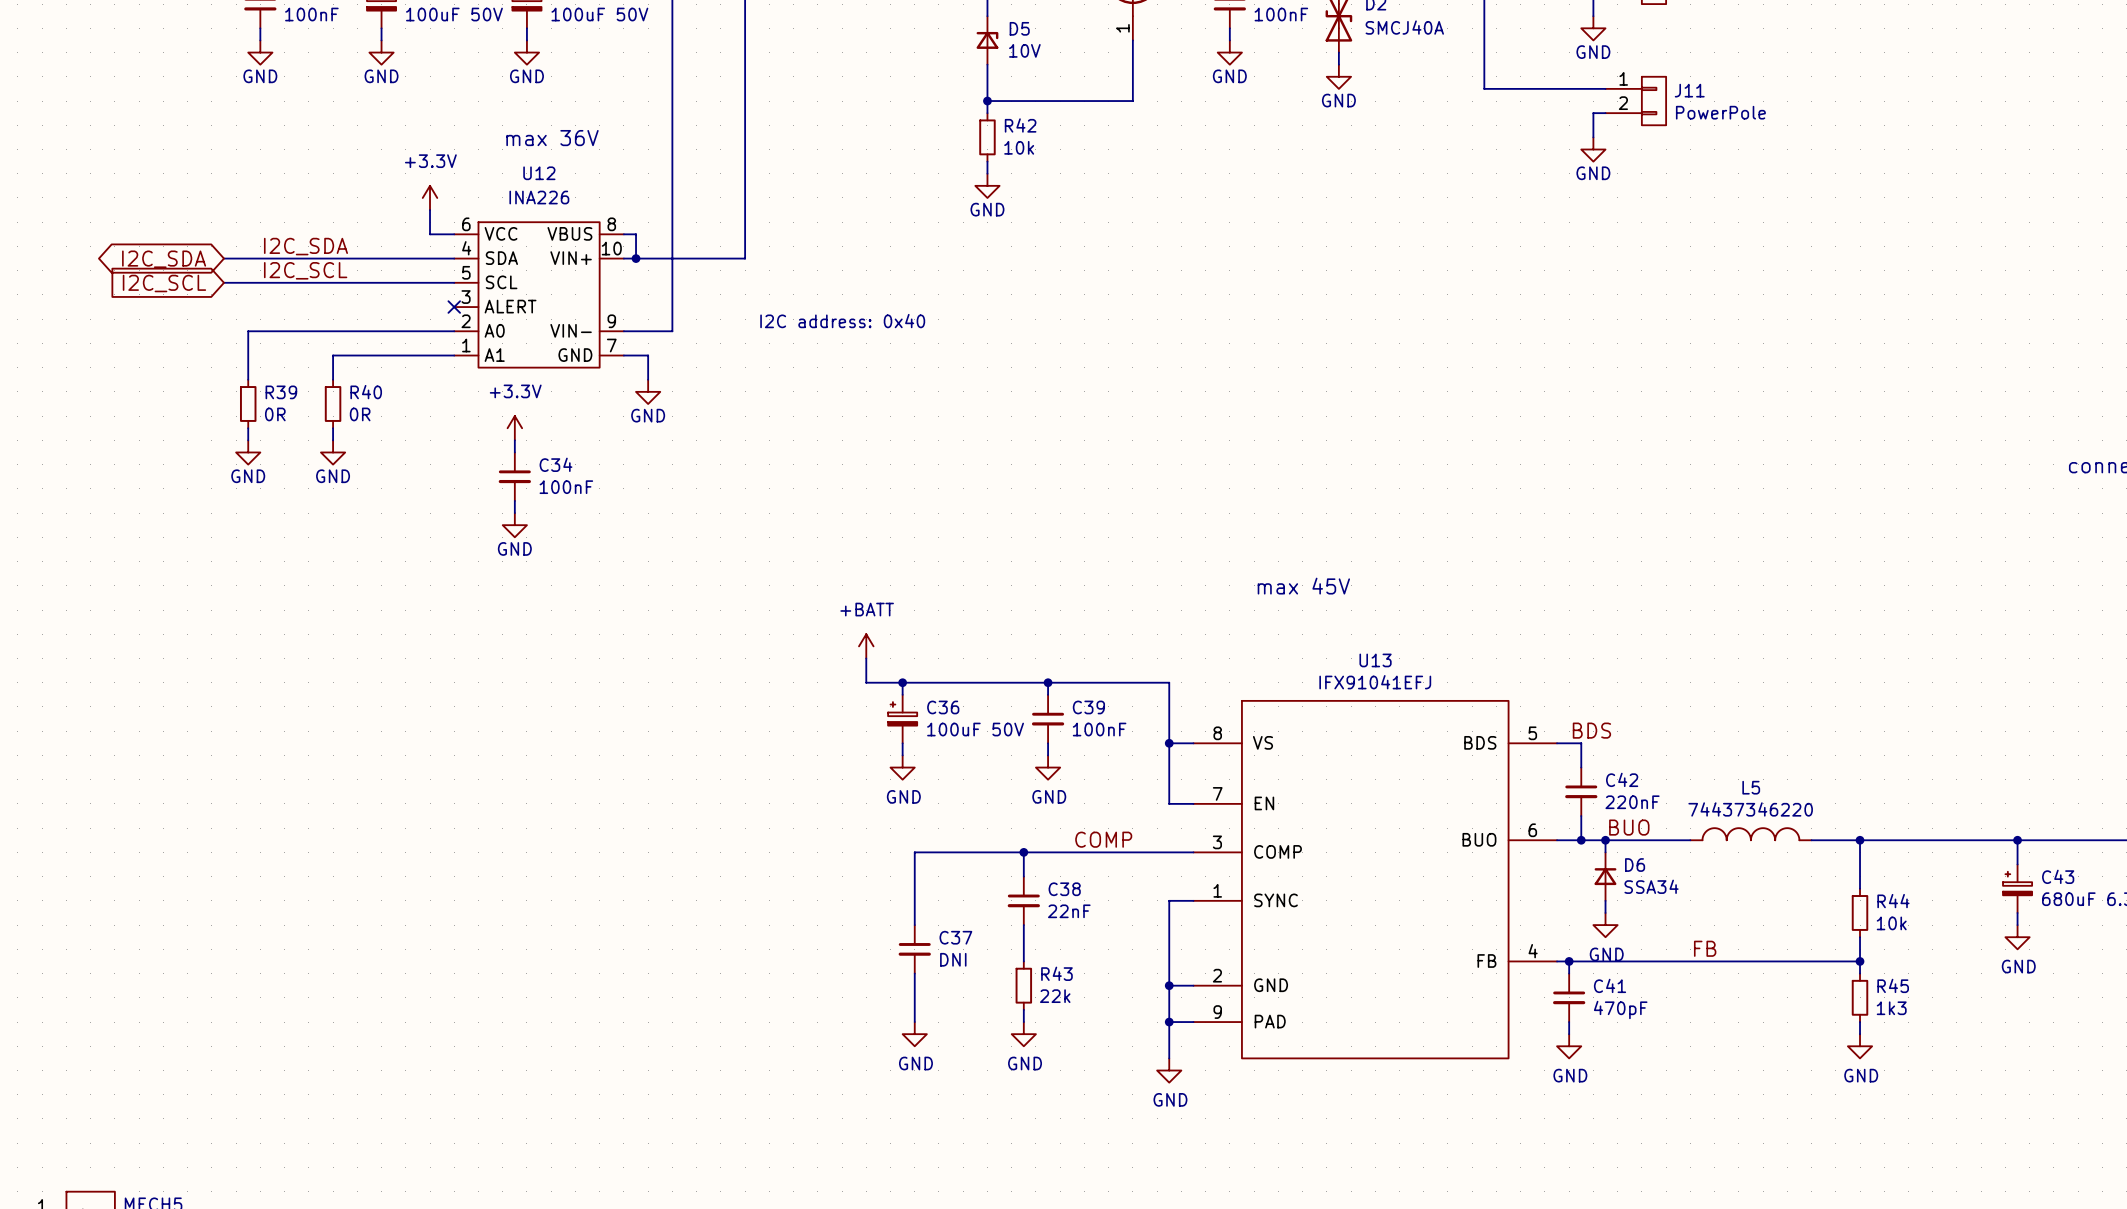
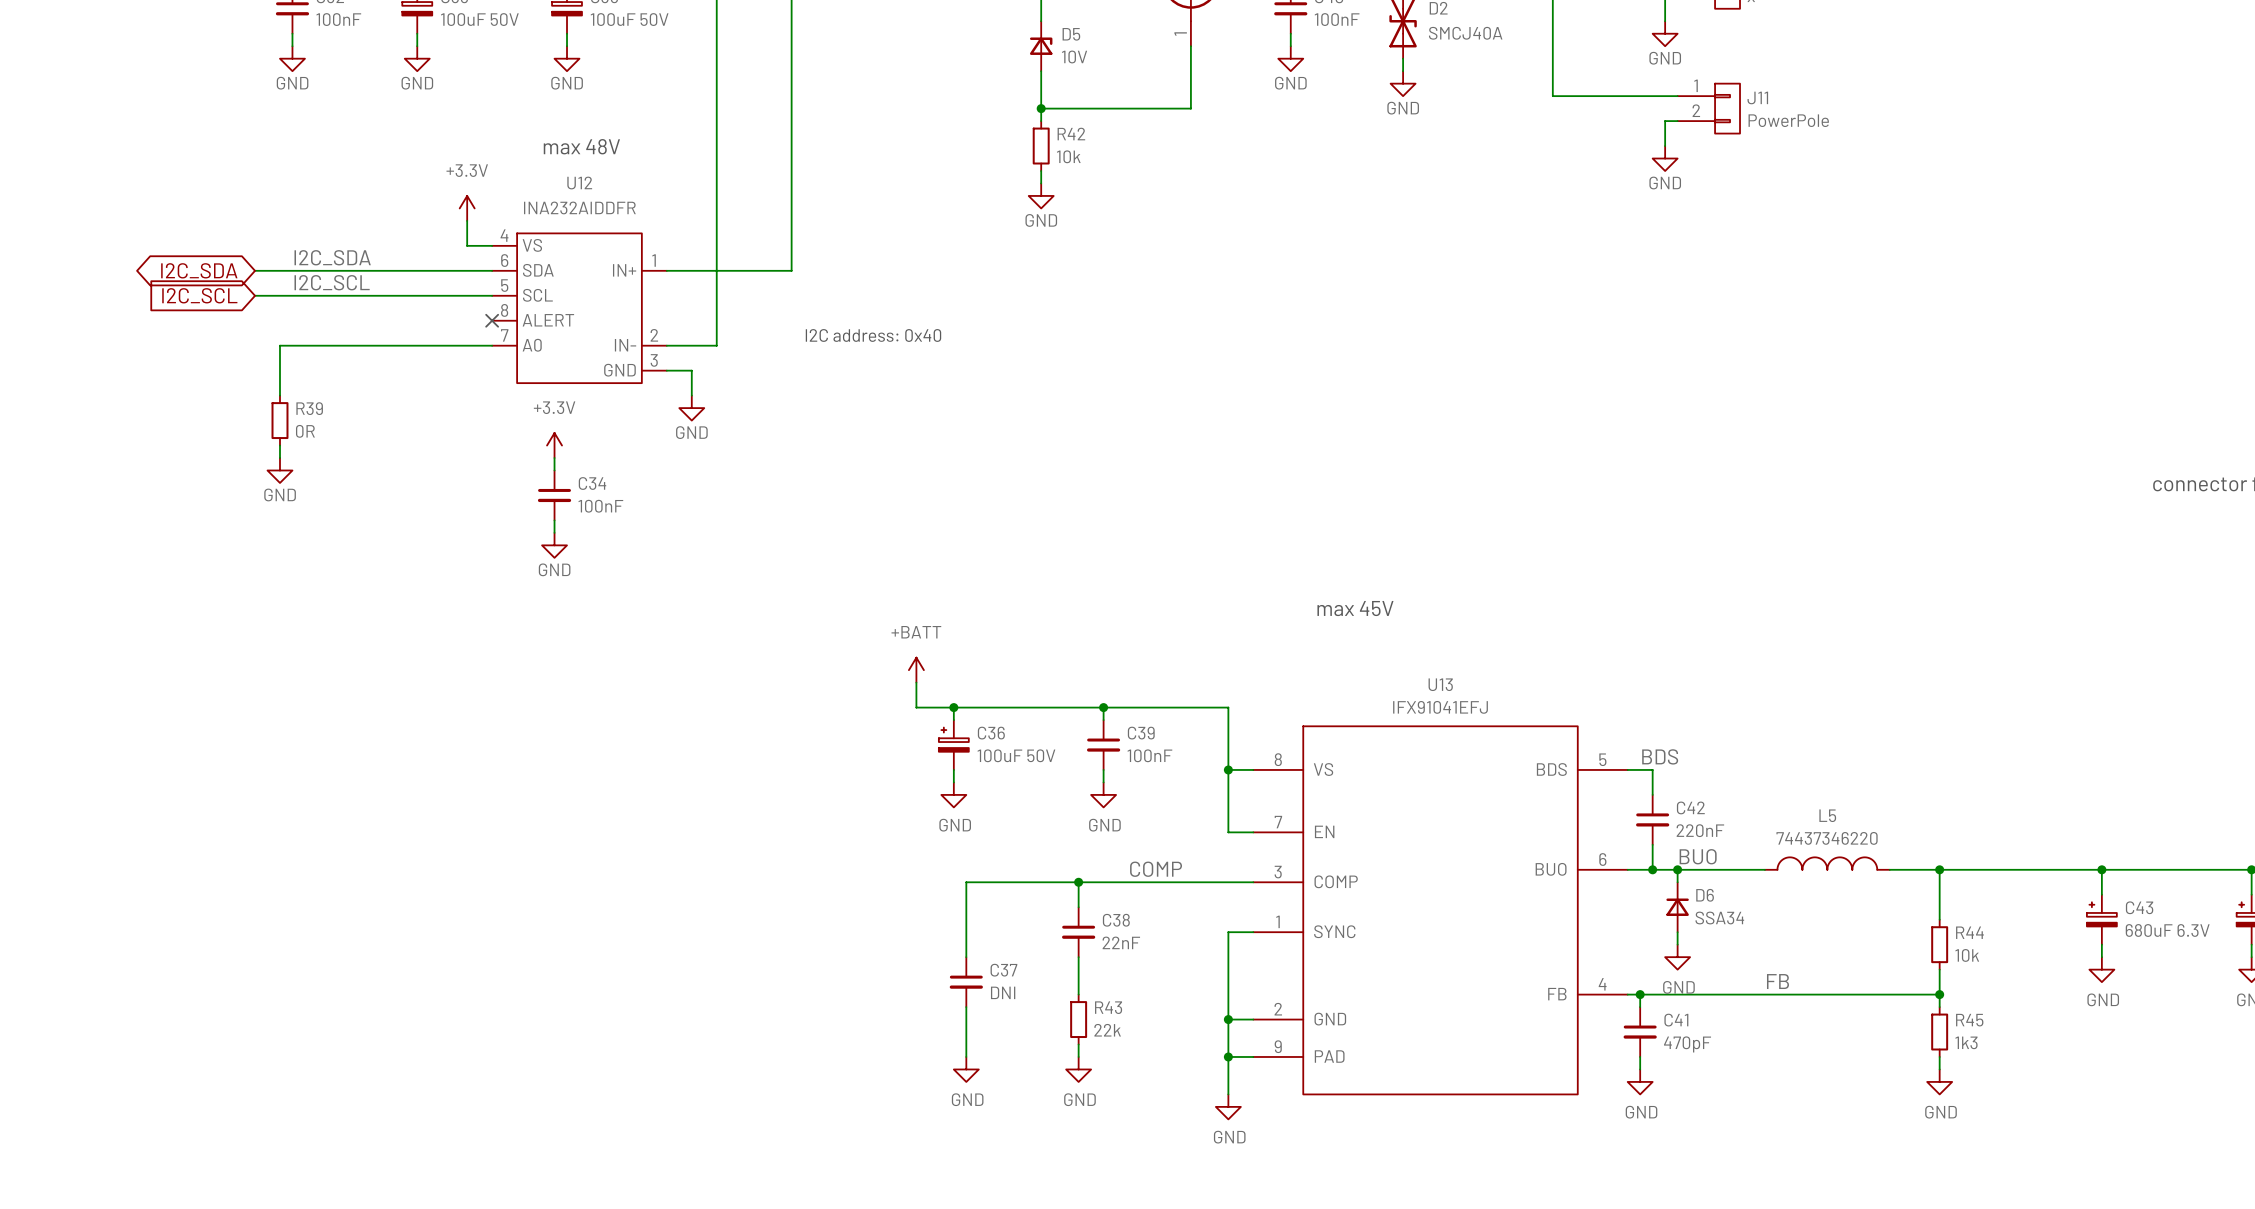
text: max 36V (552, 138) -> max 48V (581, 146)
U12 value: INA226 (539, 197) -> INA232AIDDFR (579, 207)
U12 symbol: [454, 222, 624, 368] -> [492, 233, 667, 384]
wire: (623, 234) (636, 234) (636, 258) -> none
junction: (636, 258) -> none
wire: (454, 355) (333, 355) (333, 379) -> none
R40: 0R (333, 403) -> none
wire: (333, 428) (333, 440) -> none
power symbol: GND (333, 452) -> none

